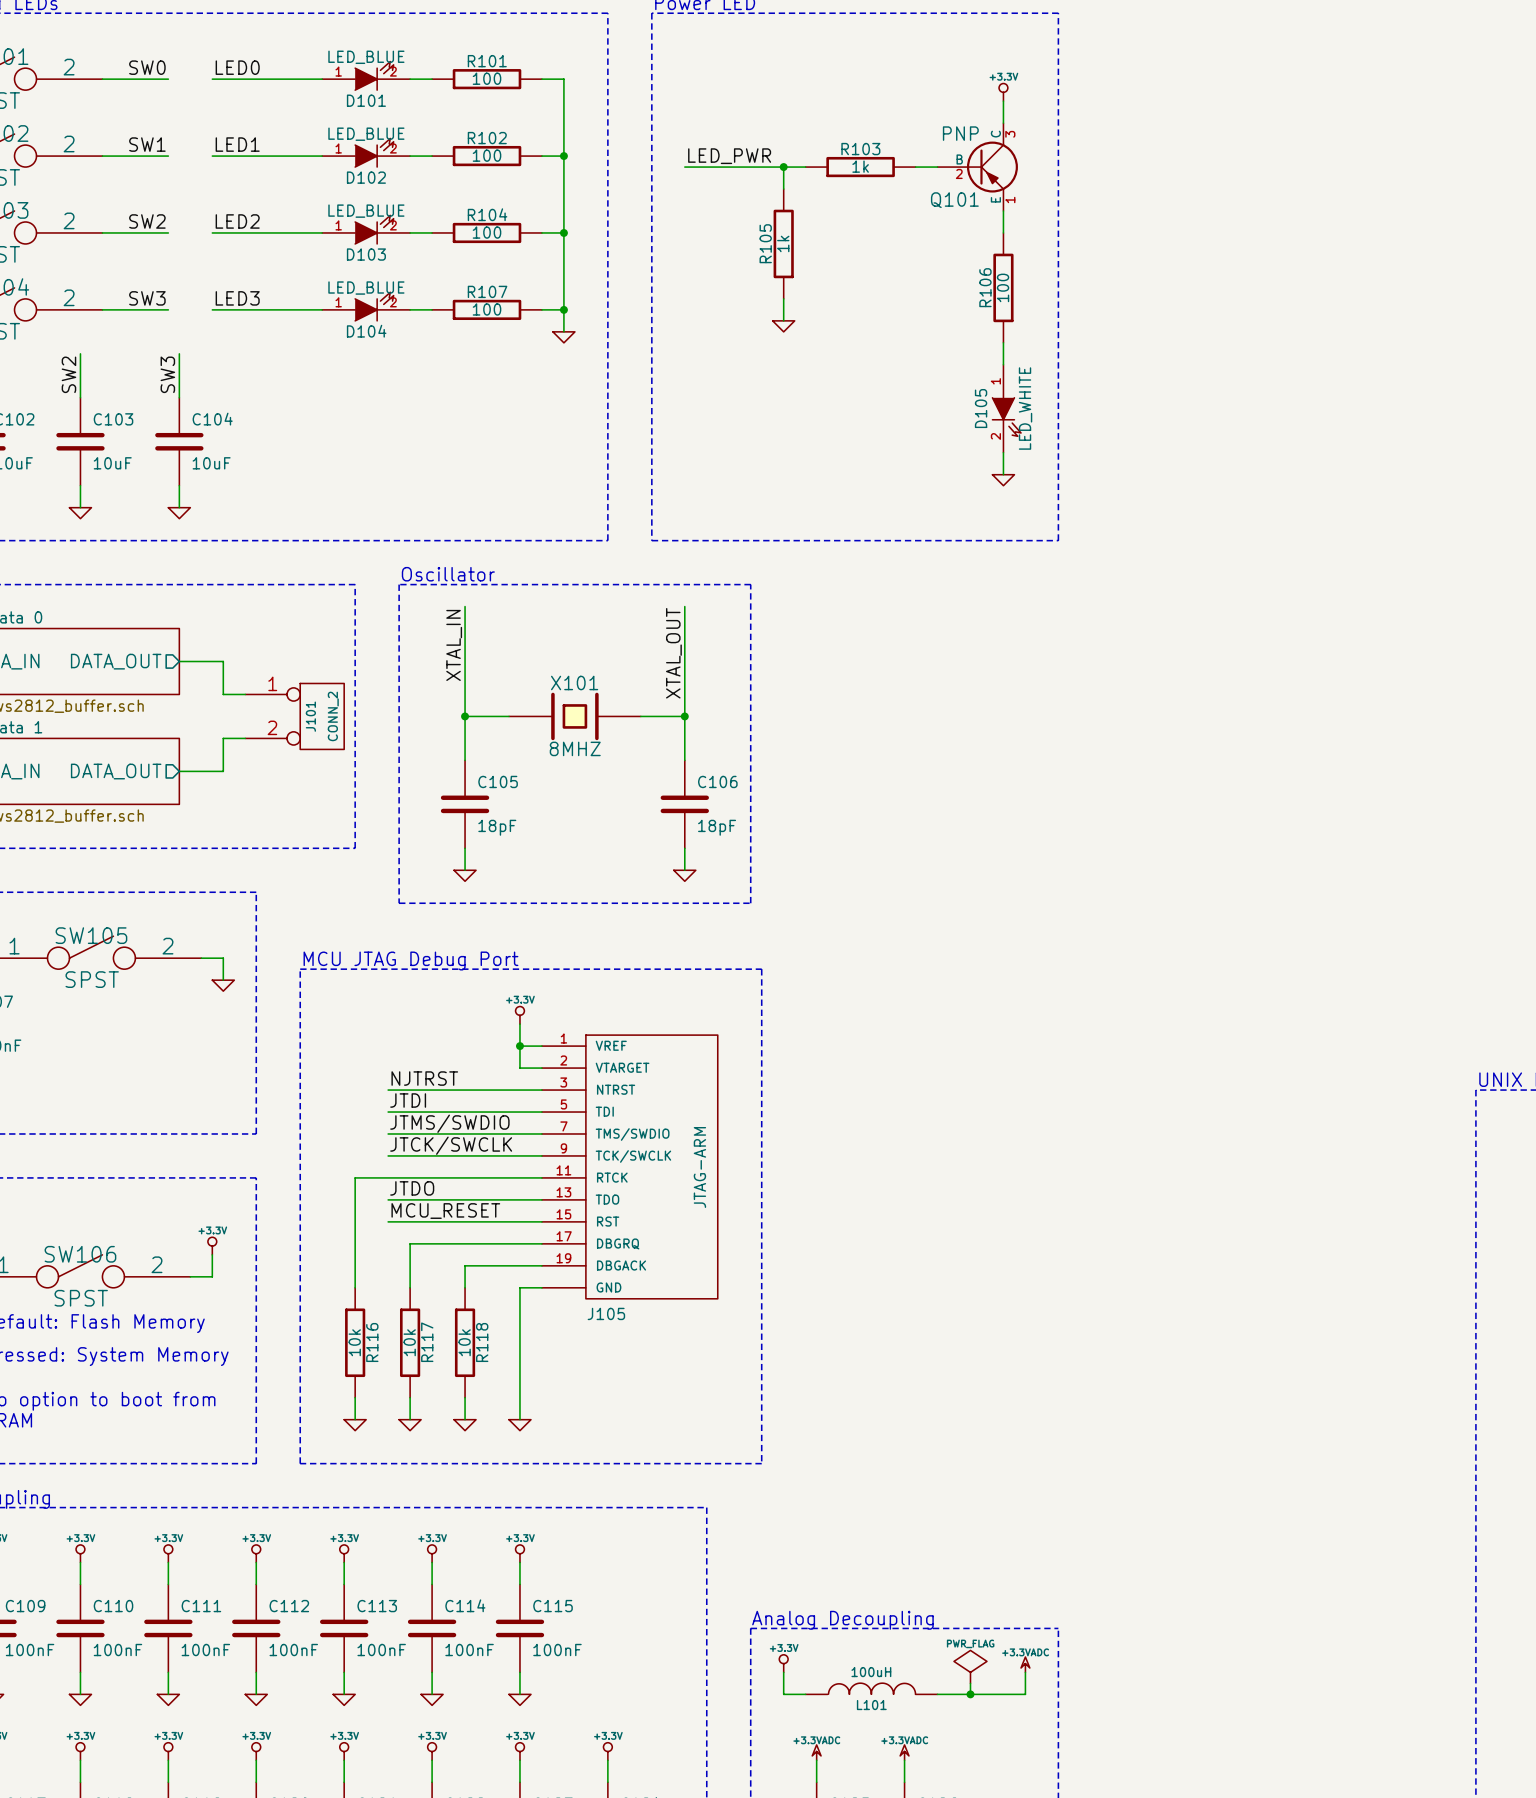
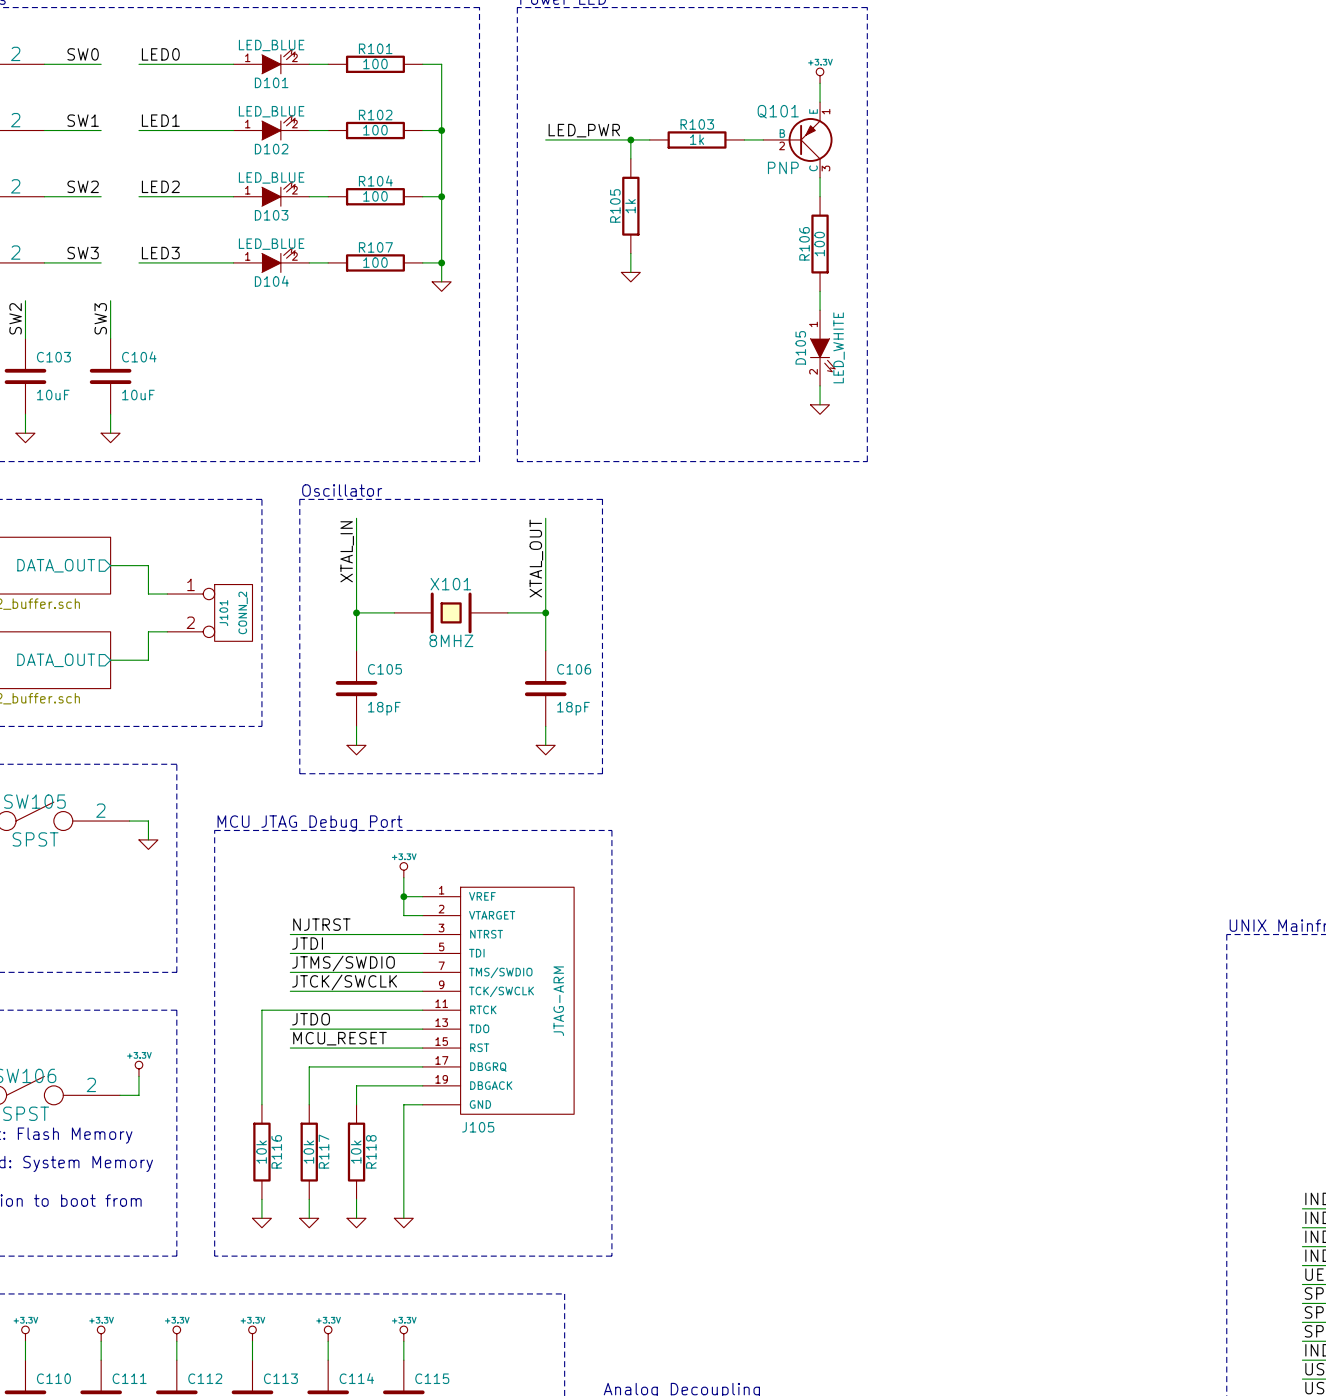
Q101 flip: as is (992, 167) -> up-down (810, 139)

